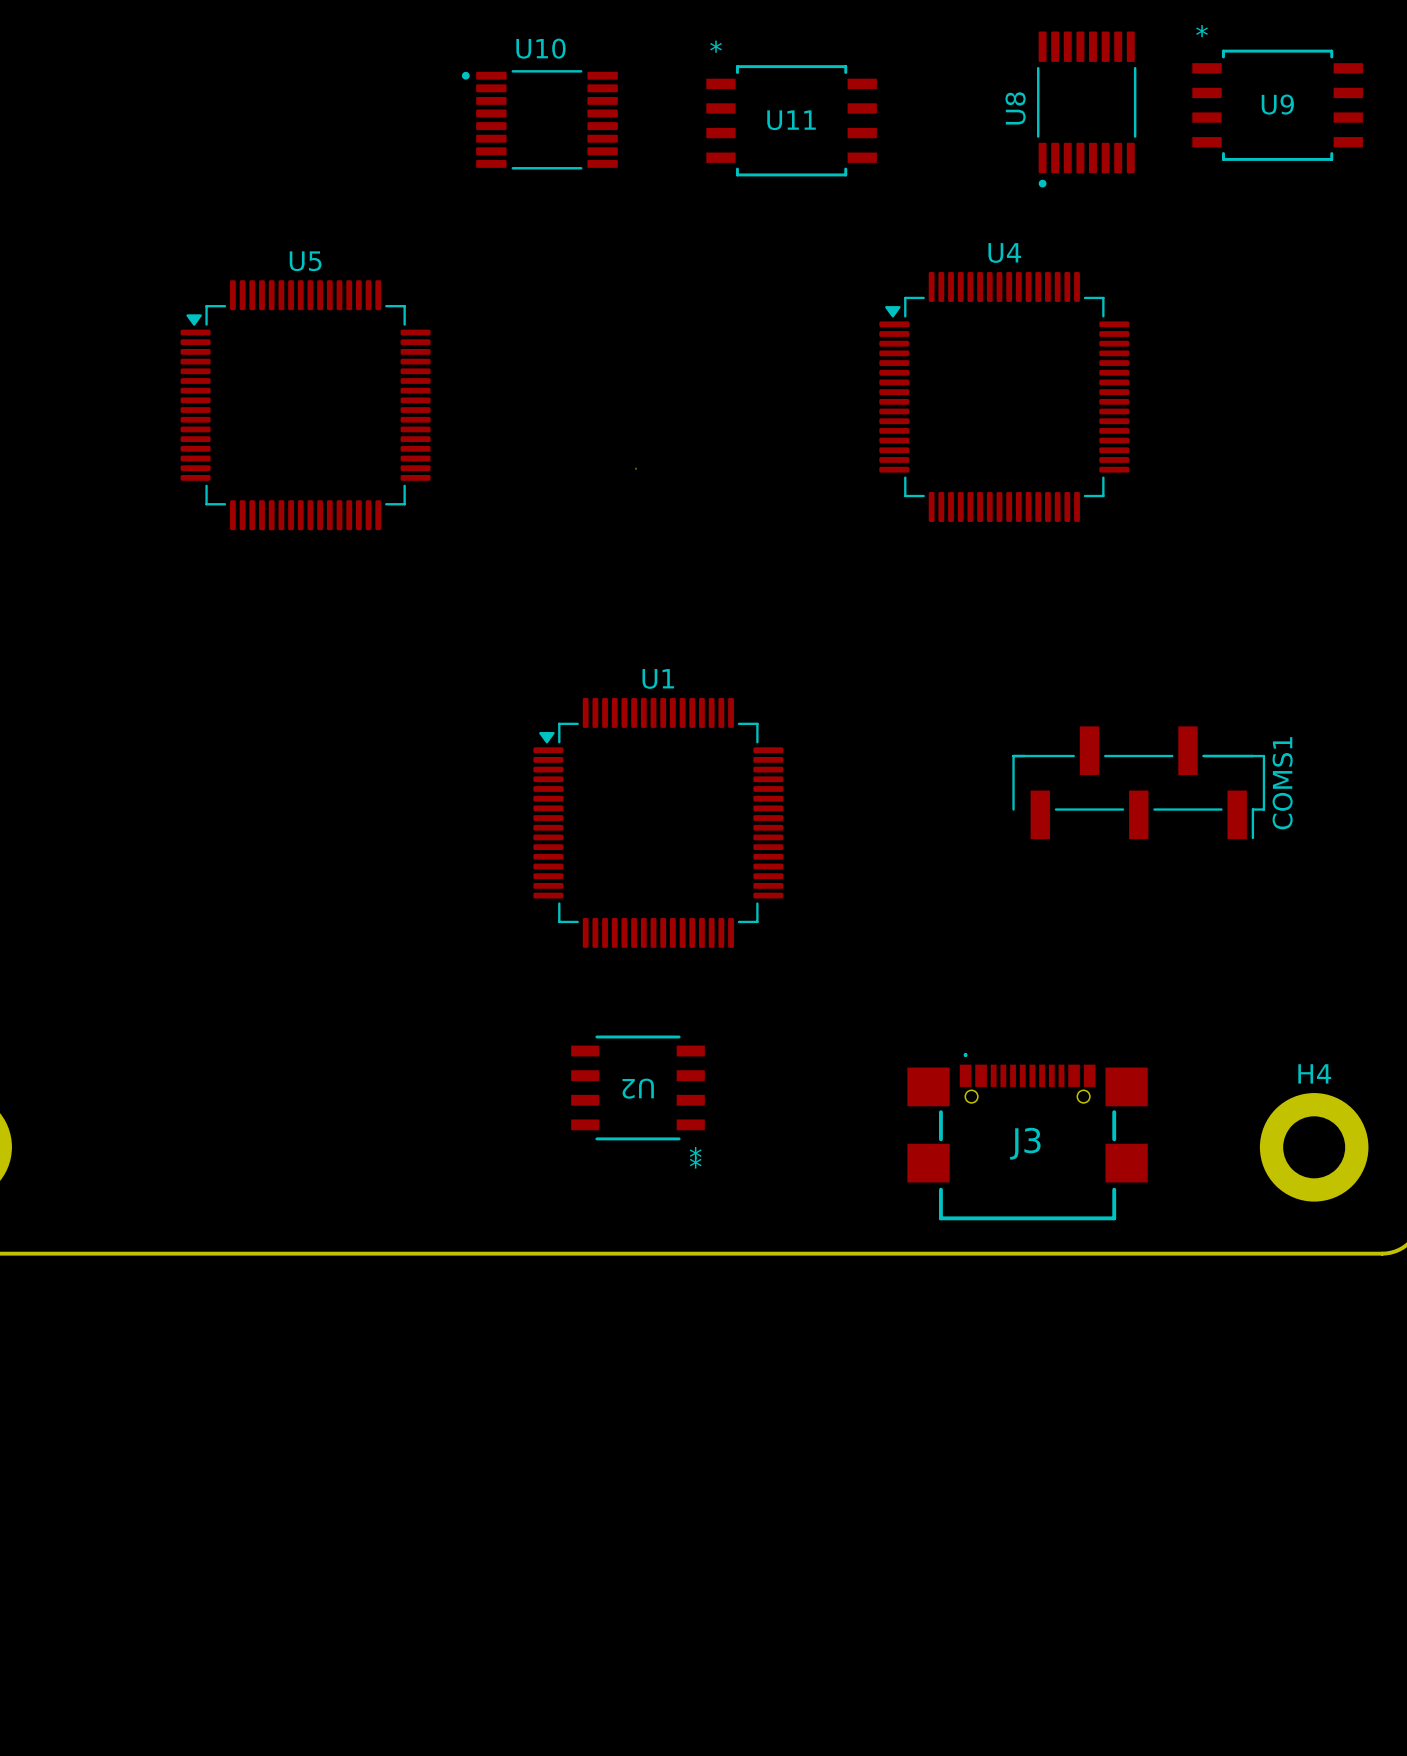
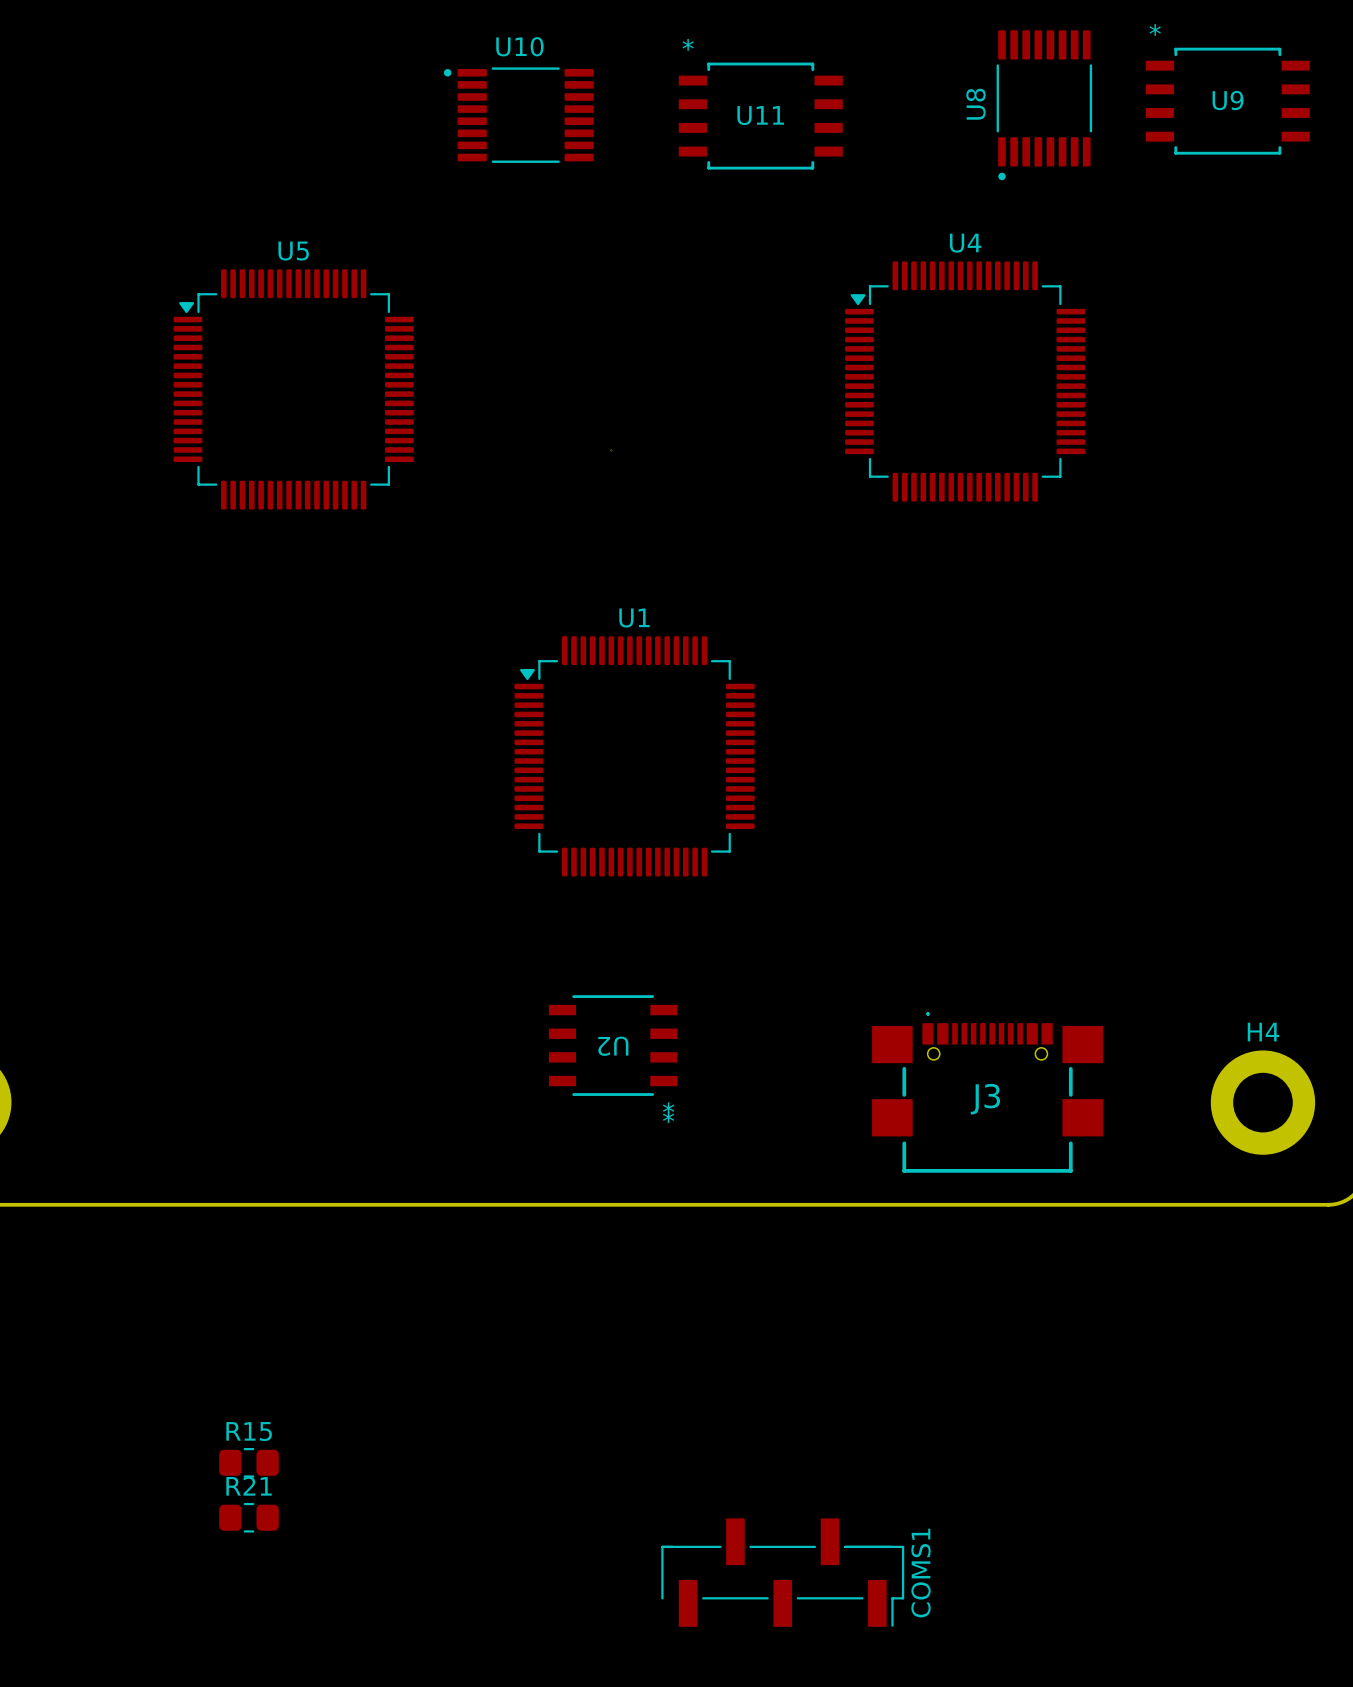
COMS1 position: (1138, 782) -> (782, 1572)
U1 position: (658, 822) -> (634, 756)
R15: none -> (248, 1462)
R21: none -> (248, 1517)

